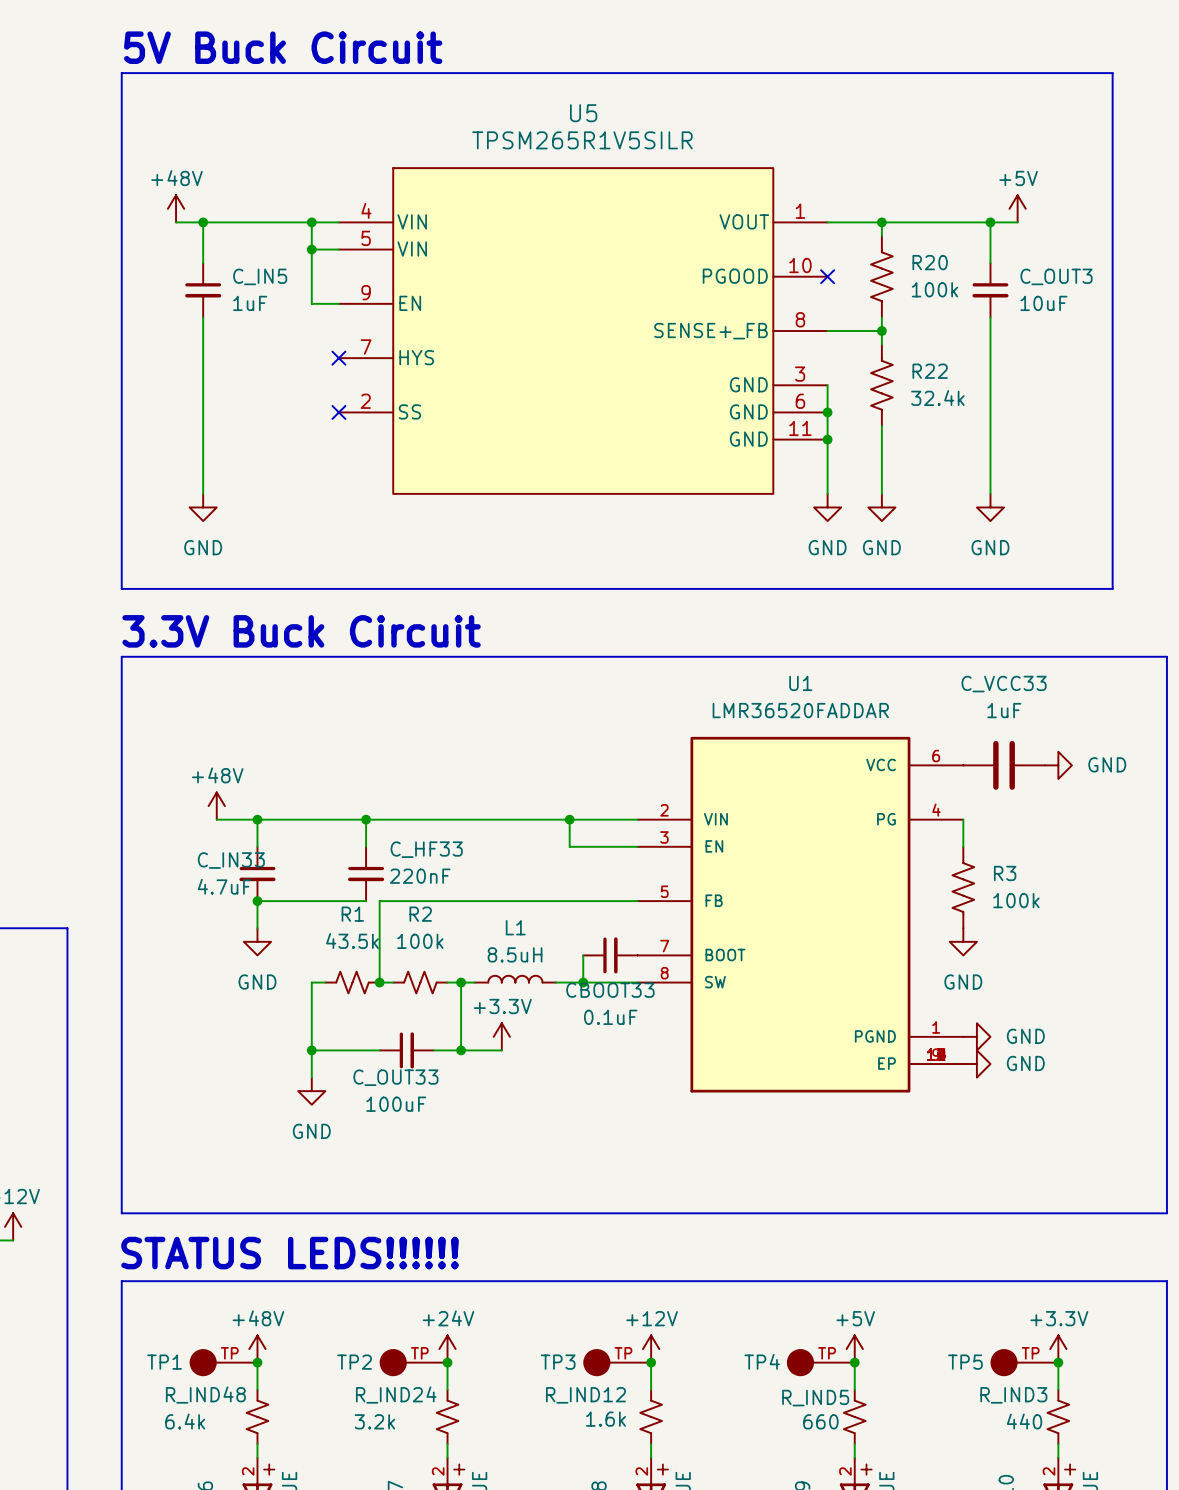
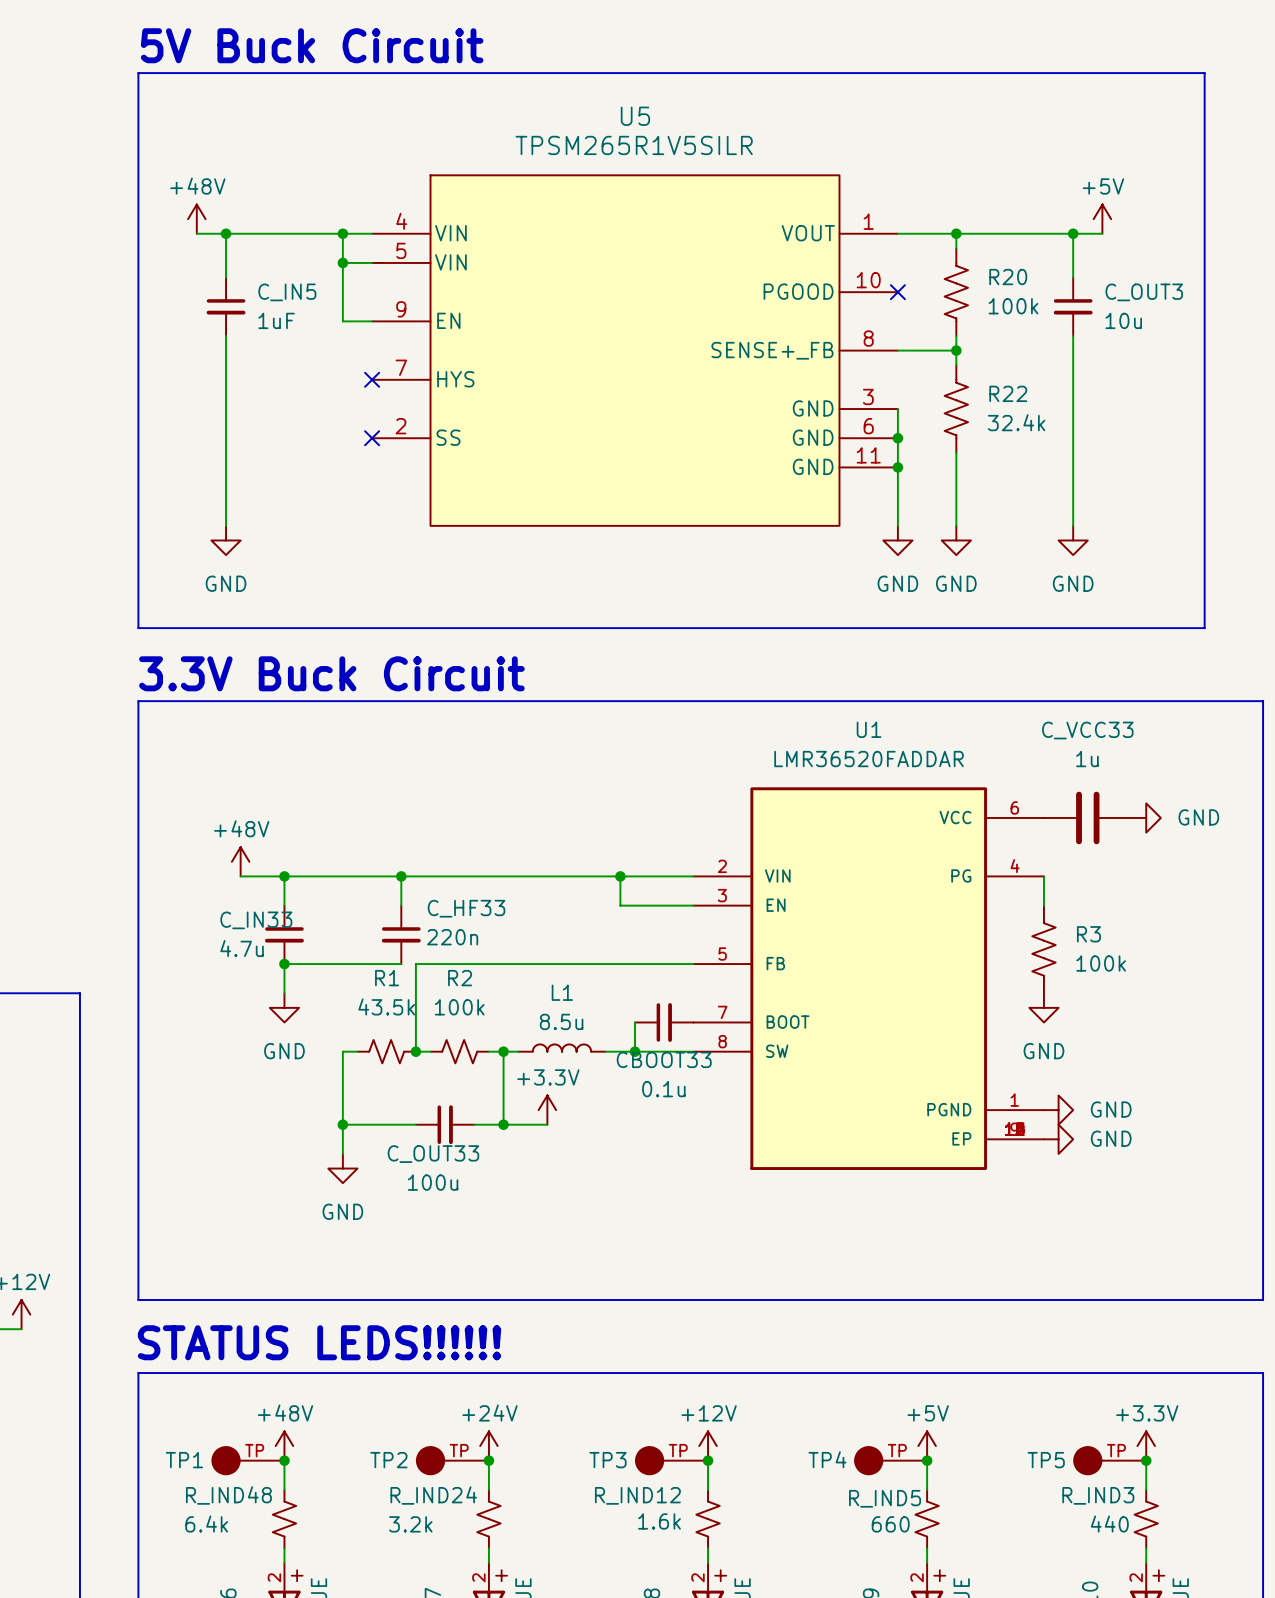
C_OUT3 value: 10uF (1043, 303) -> 10u (1123, 320)
C_VCC33 value: 1uF (1004, 710) -> 1u (1087, 759)
C_HF33 value: 220nF (420, 876) -> 220n (452, 937)
C_IN33 value: 4.7uF (224, 886) -> 4.7u (242, 948)
L1 value: 8.5uH (515, 954) -> 8.5u (561, 1021)
CBOOT33 value: 0.1uF (610, 1017) -> 0.1u (663, 1089)
C_OUT33 value: 100uF (396, 1104) -> 100u (433, 1182)

